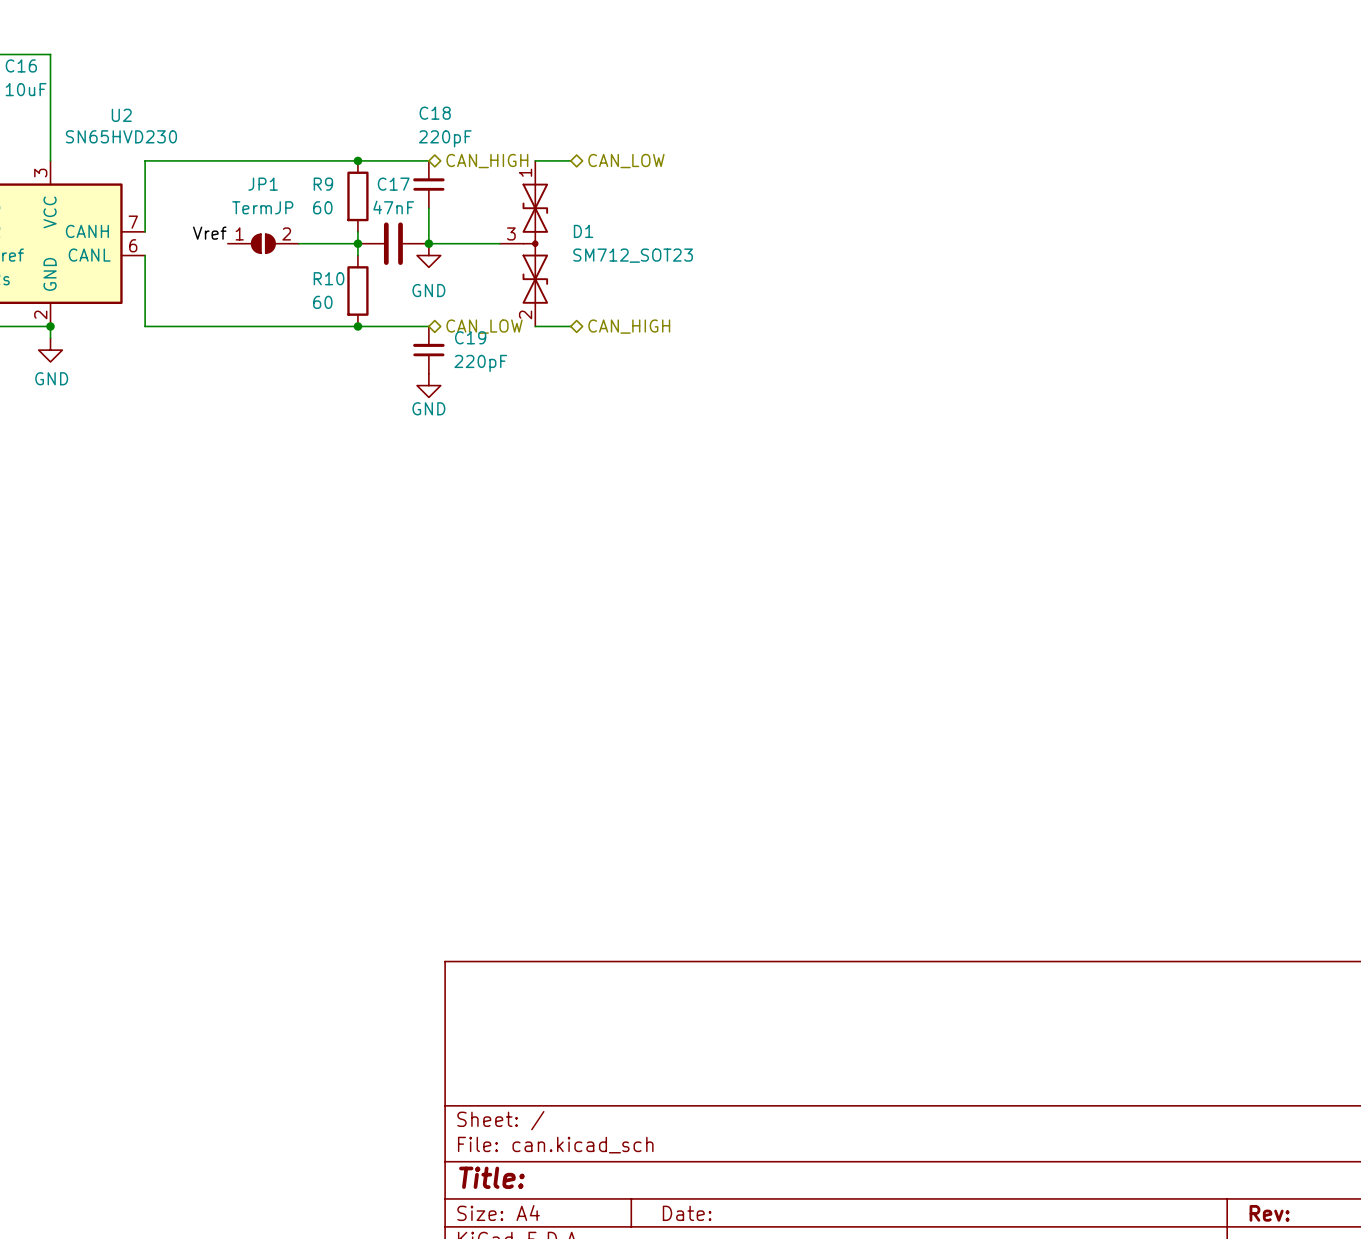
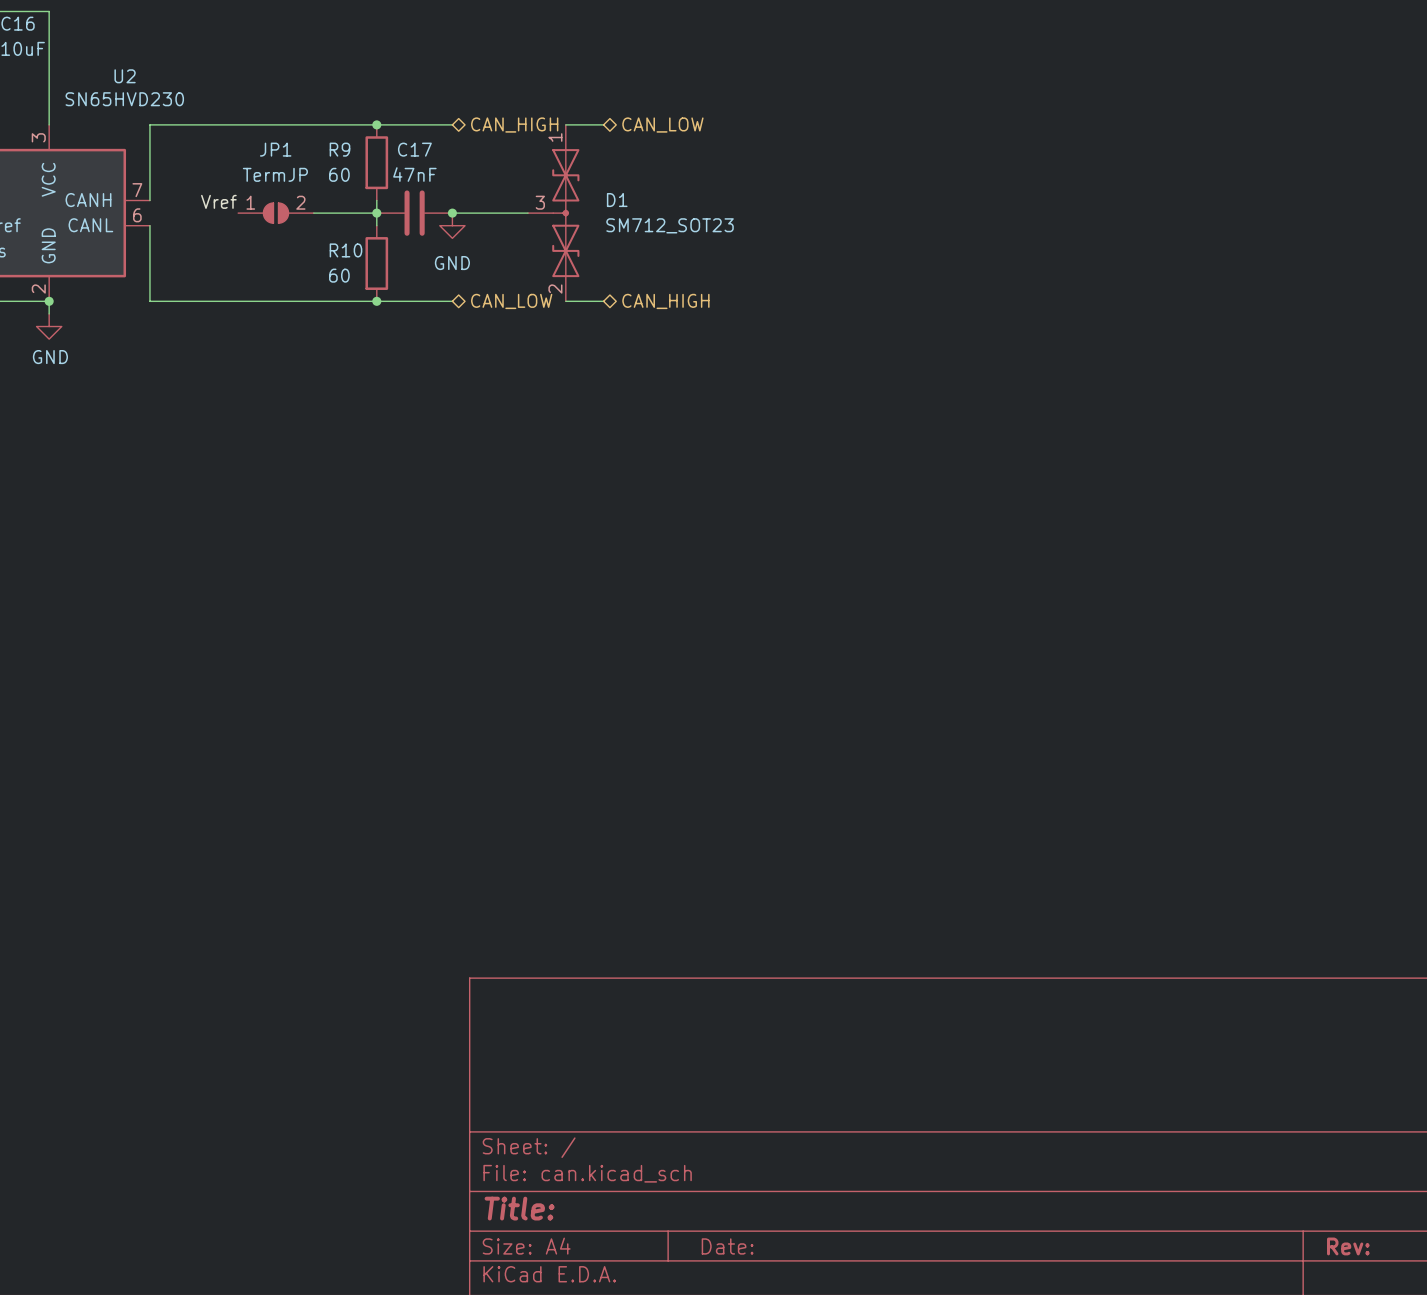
C18: 220pF (428, 184) -> none
wire: (428, 208) (428, 243) -> none
C19: 220pF (428, 350) -> none
power symbol: GND (428, 385) -> none

